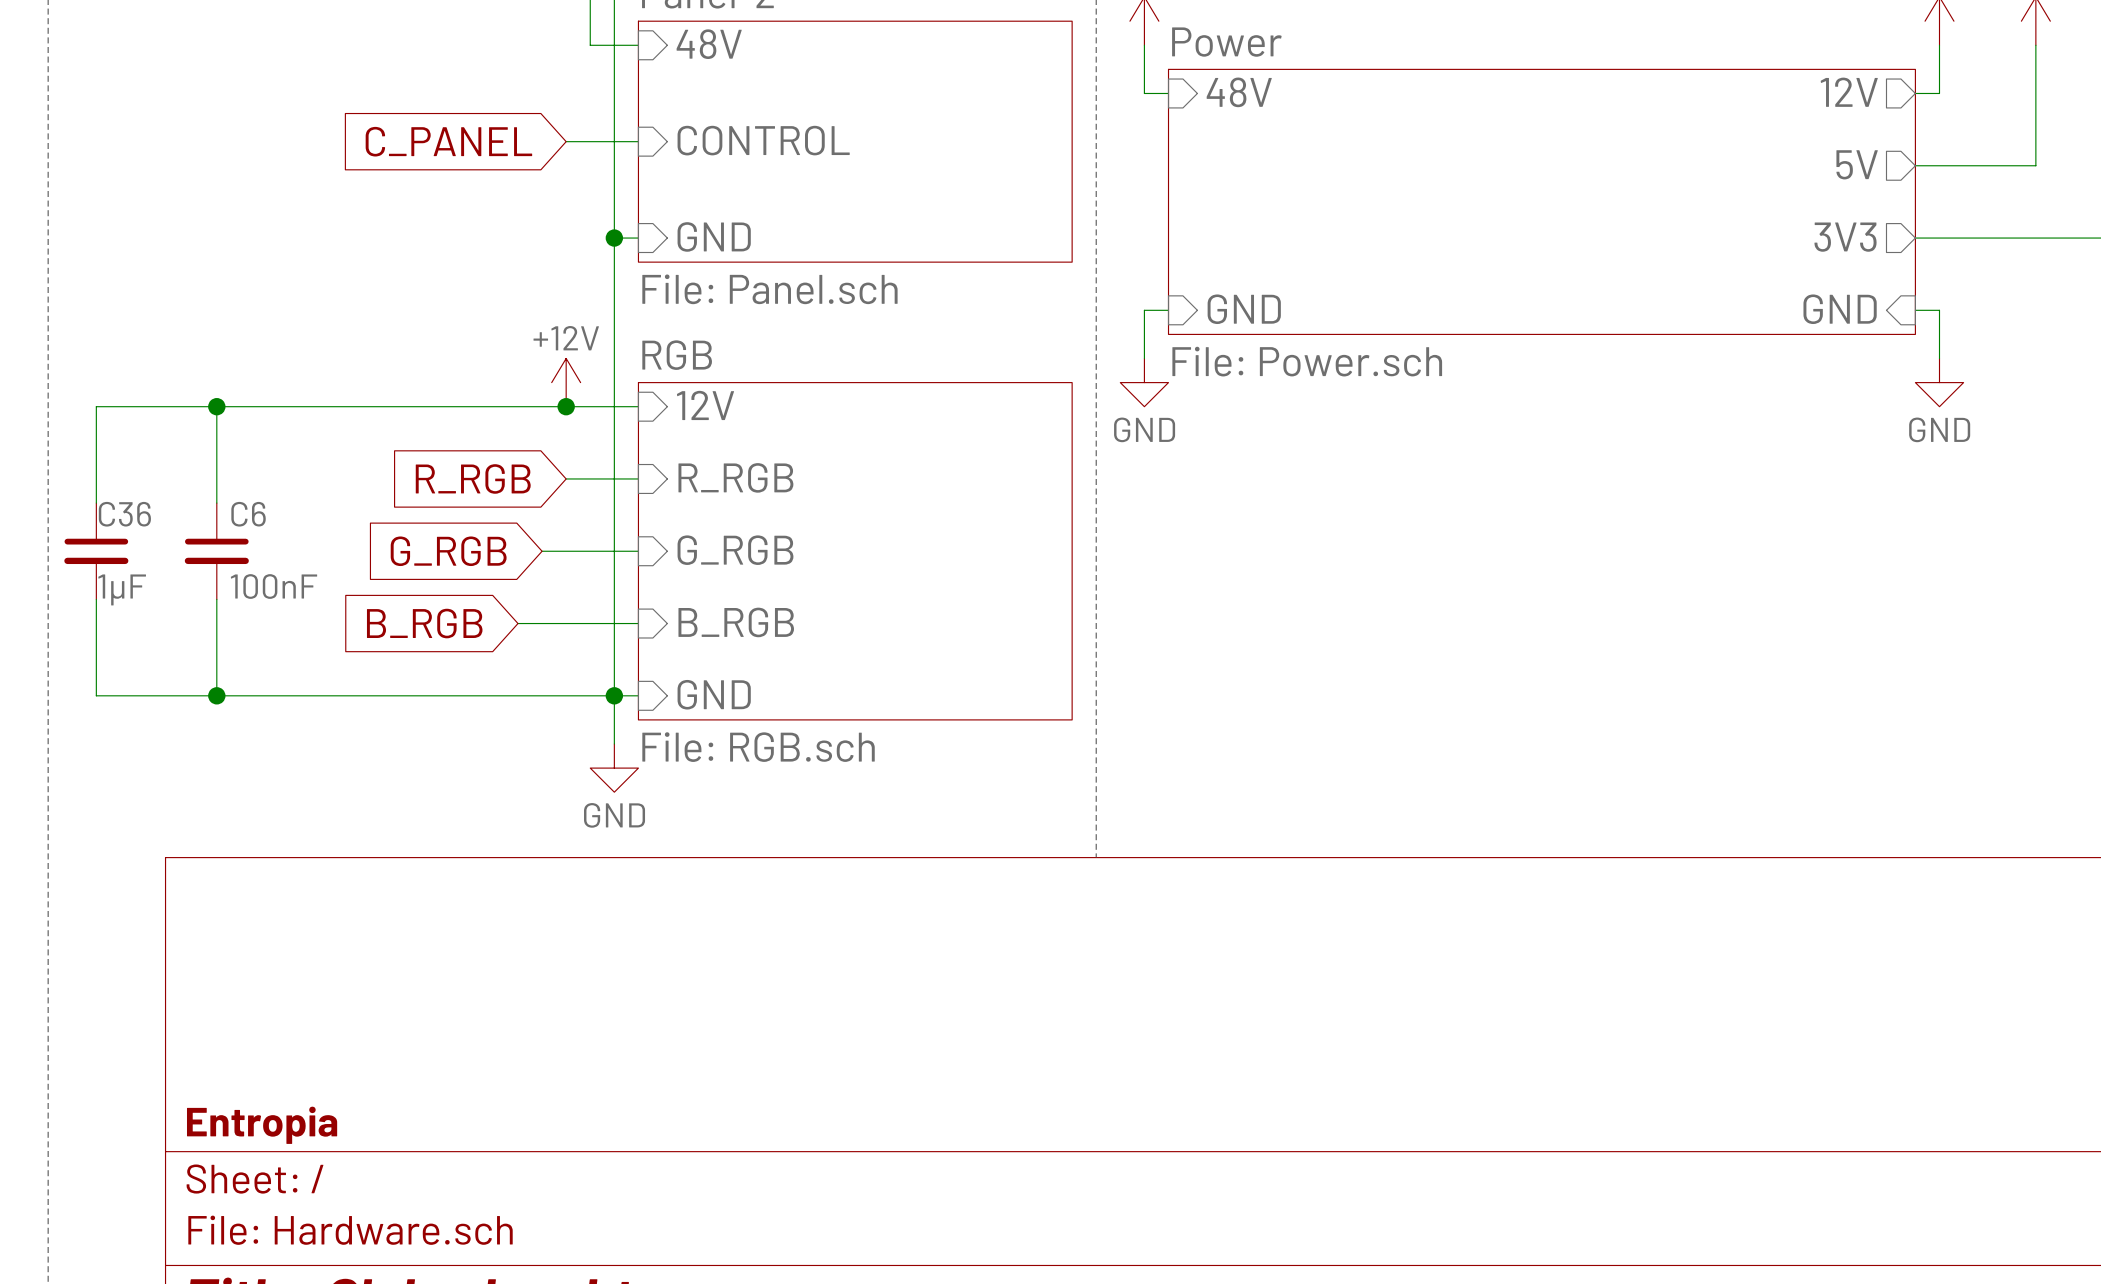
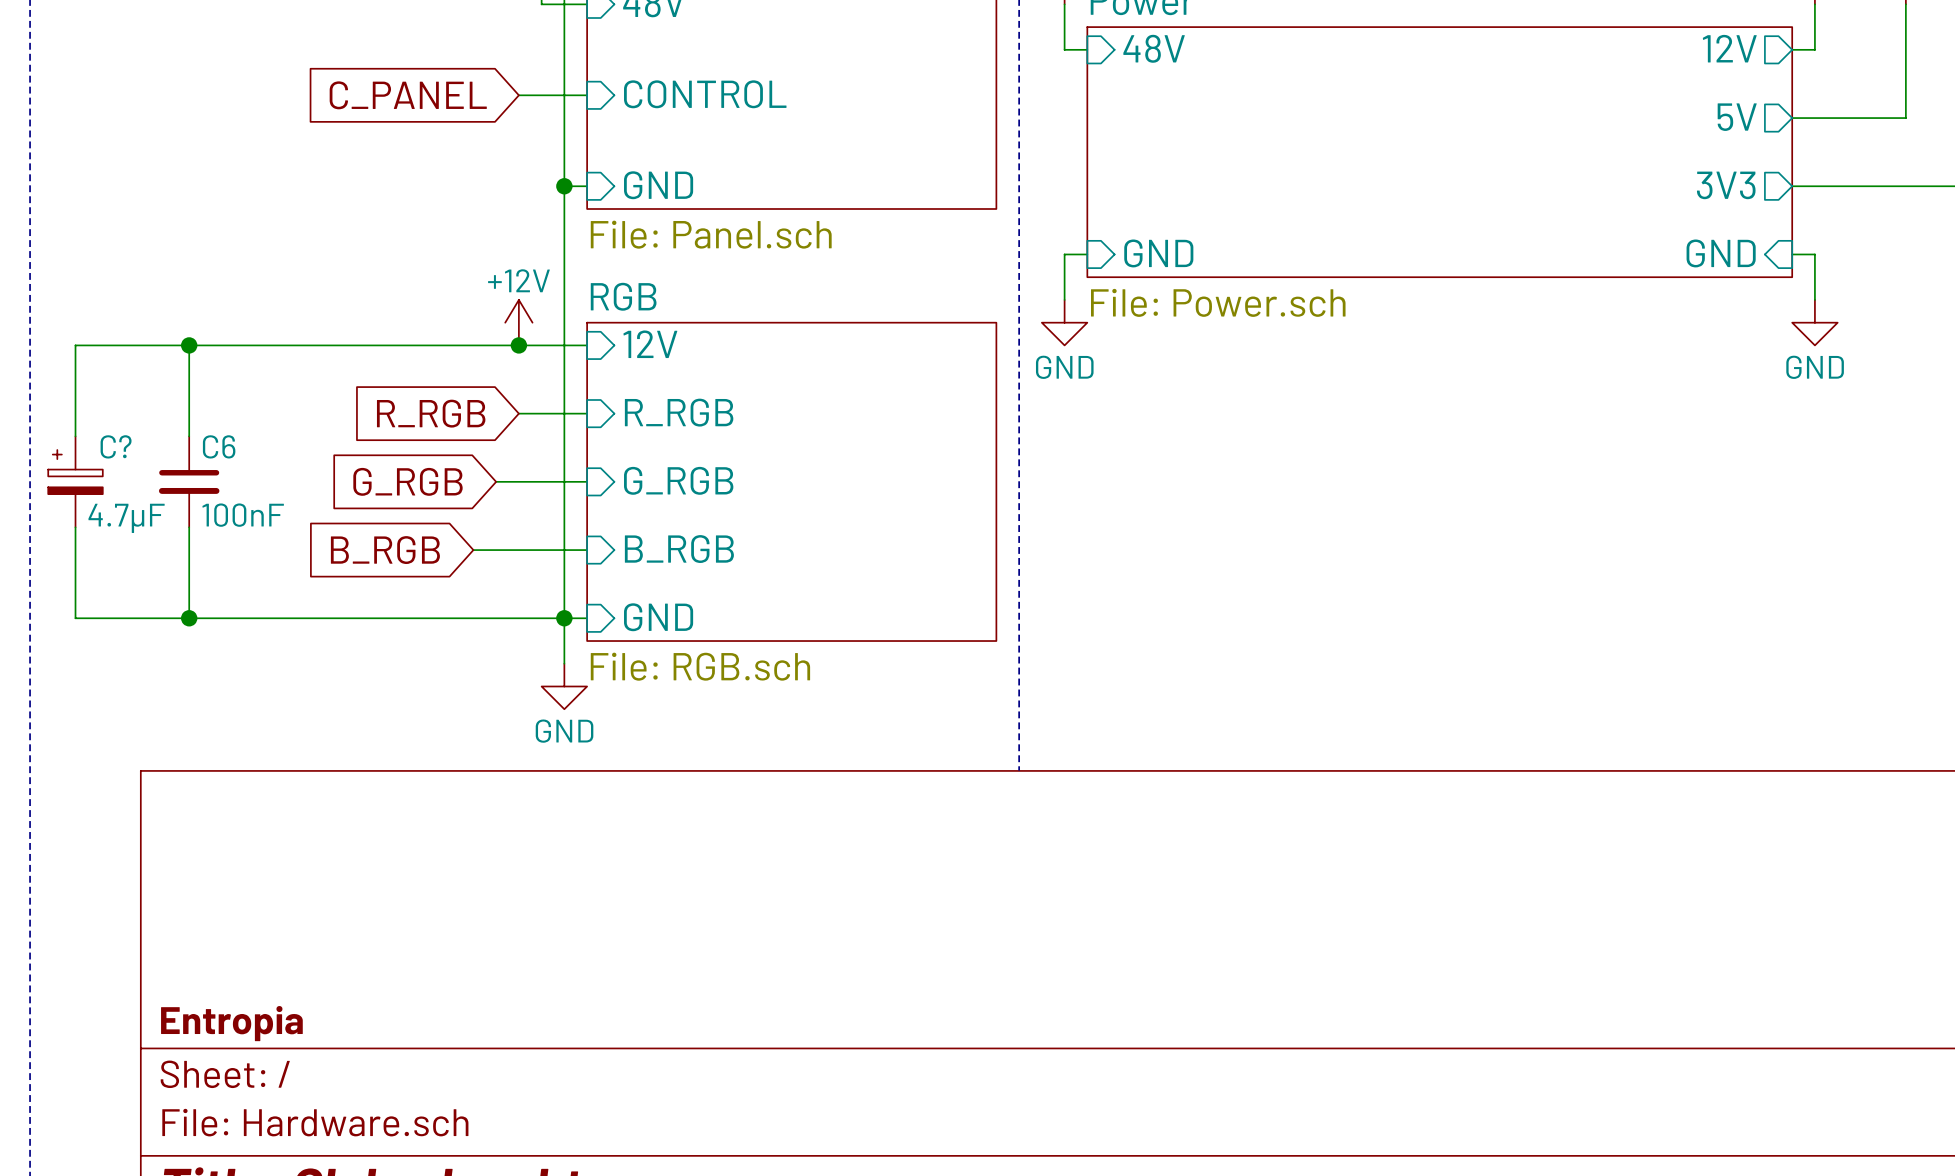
C36: 1μF (96, 551) -> none
C?: none -> 4.7μF (75, 481)

